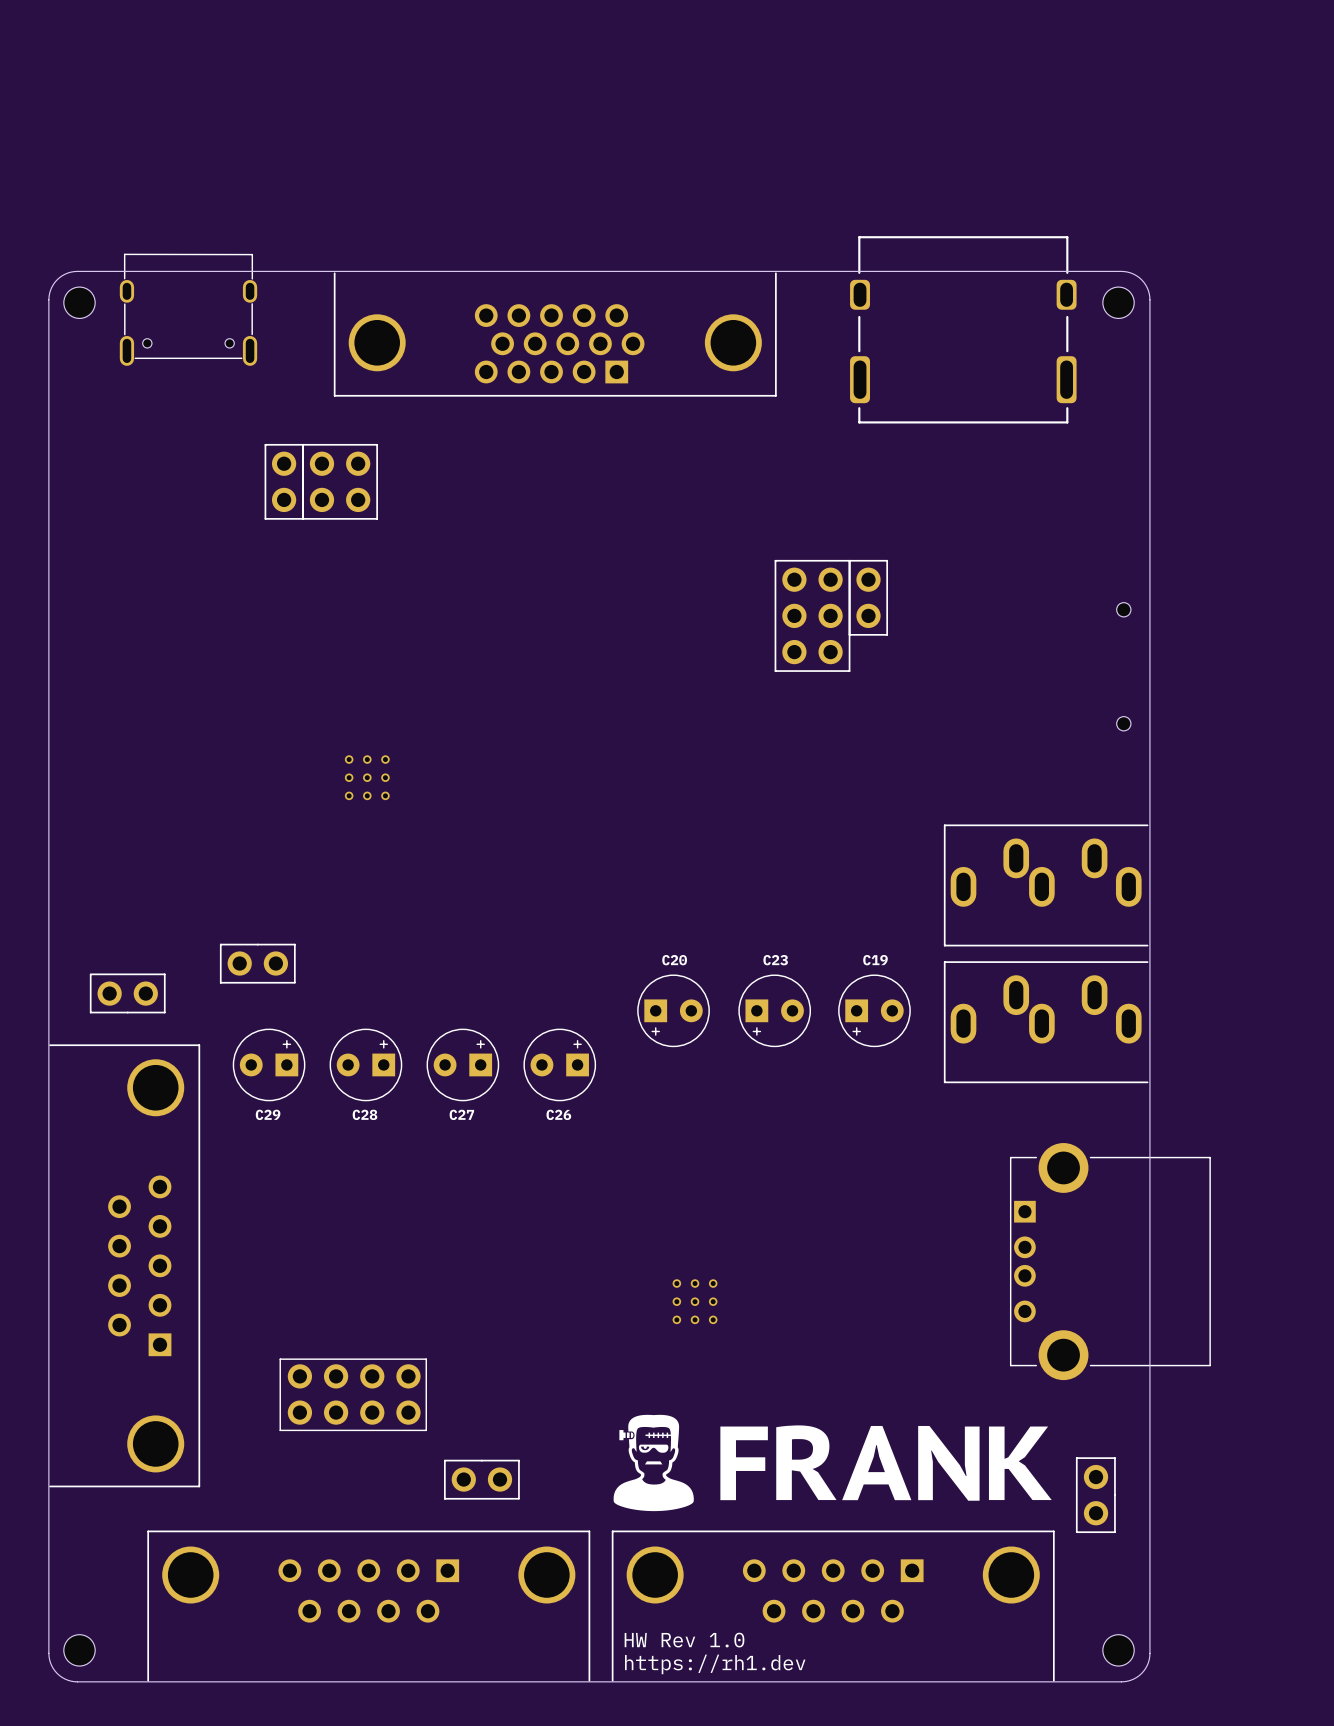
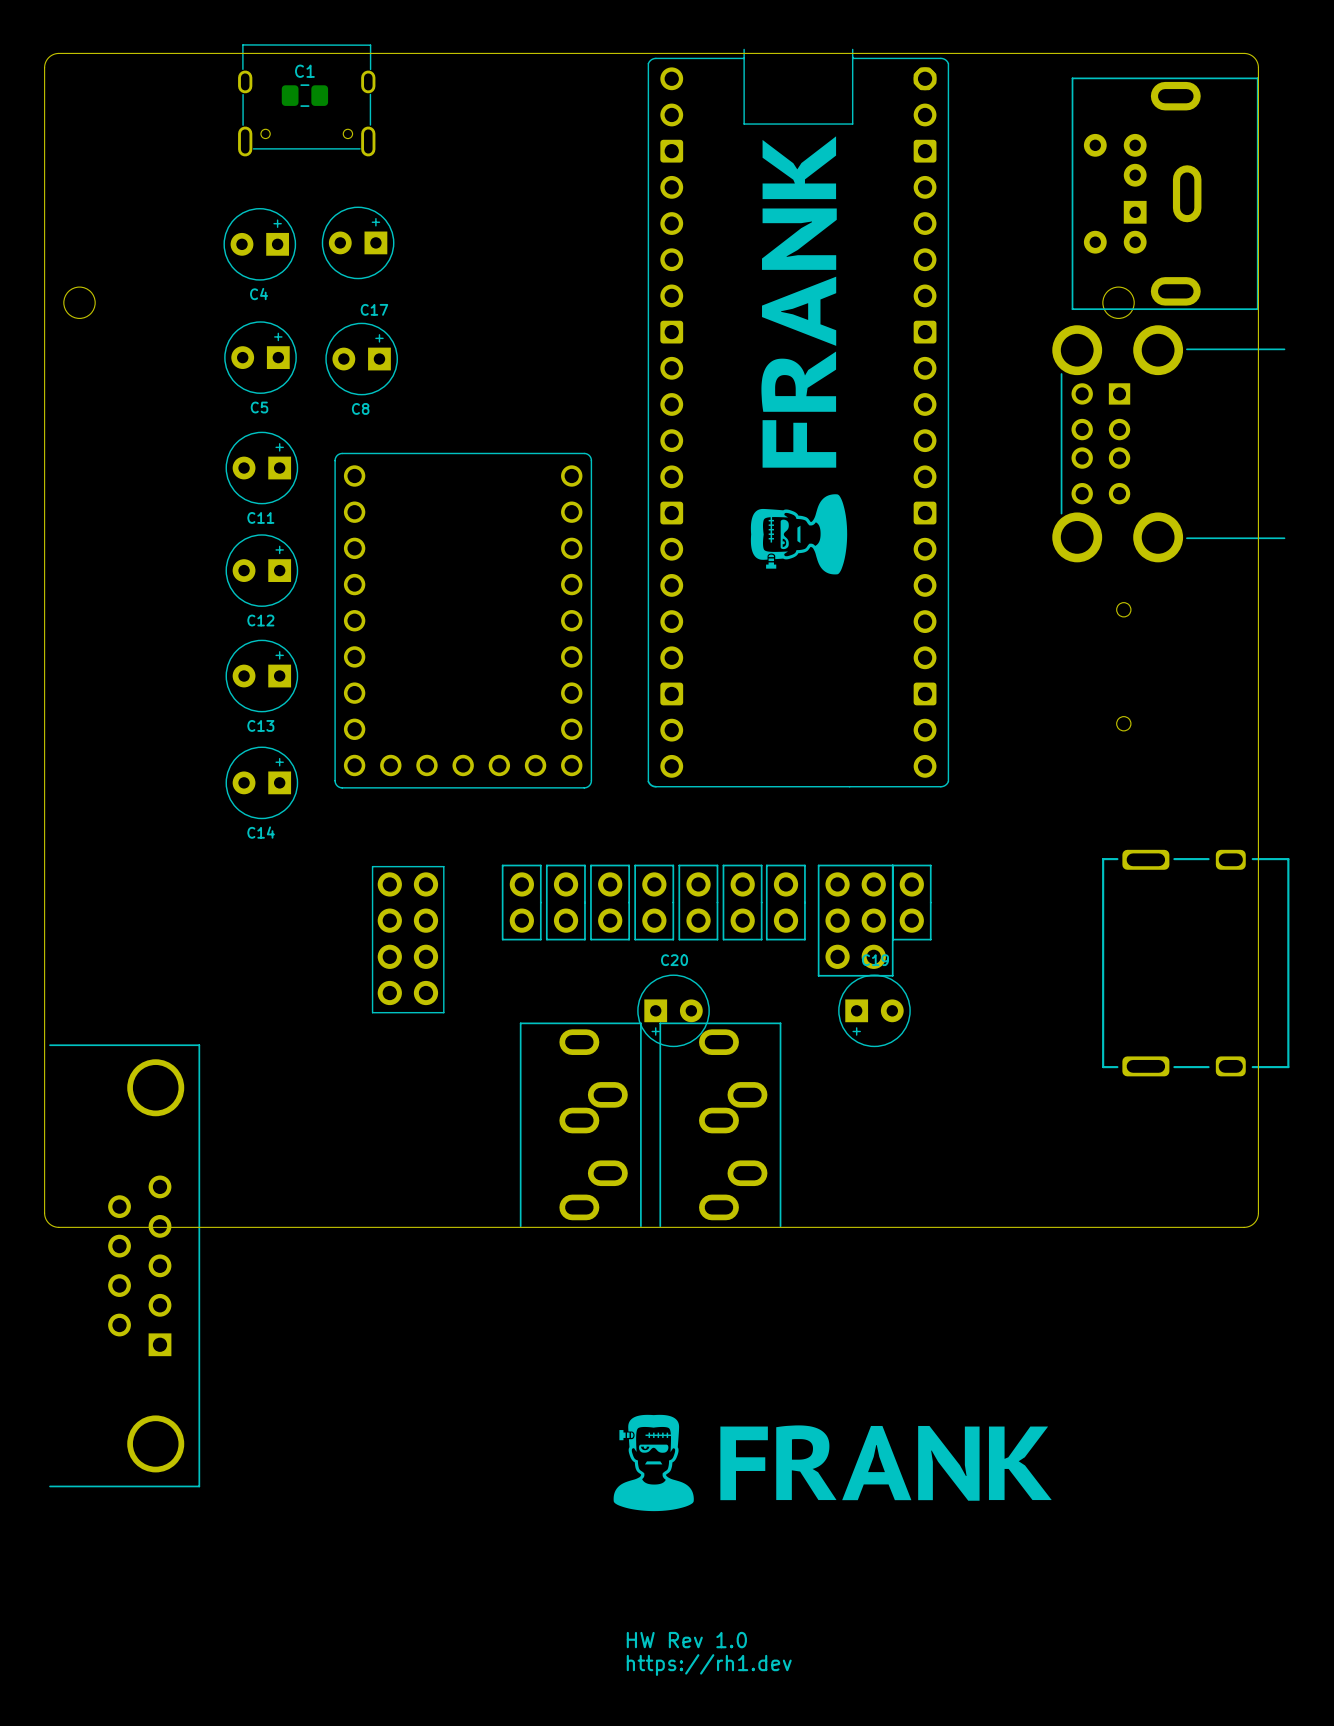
C1: none -> (304, 95)
drawing: none -> [761, 136, 837, 468]
part: none -> (1165, 193)
C17: none -> (358, 242)
C4: none -> (259, 244)
board edge: (1121, 271) (77, 271) (65, 274) (55, 282) (50, 290) (48, 299) (48, 1653) (51, 1665) (59, 1675) (67, 1680) (77, 1681) (1121, 1681) (1133, 1679) (1143, 1671) (1148, 1662) (1149, 1653) (1149, 299) (1147, 287) (1141, 279) (1133, 274) (1121, 271) -> (1244, 53) (1254, 57) (1258, 67) (1258, 1213) (1254, 1223) (1244, 1227) (58, 1227) (48, 1223) (44, 1213) (44, 67) (48, 57) (58, 53) (1244, 53)
part position: (188, 309) -> (306, 100)
part: (963, 329) -> none
part: (555, 334) -> none
C5: none -> (260, 357)
C8: none -> (361, 359)
part: none -> (798, 418)
part: none -> (1168, 443)
C11: none -> (261, 468)
part: (284, 481) -> none
part: (340, 481) -> none
drawing: none -> [750, 494, 848, 575]
C12: none -> (261, 570)
part: (868, 597) -> none
part position: (812, 615) -> (855, 920)
part: none -> (463, 620)
C13: none -> (261, 676)
part: (367, 777) -> none
C14: none -> (261, 782)
part: (1046, 885) -> none
part: none -> (521, 902)
part: none -> (565, 902)
part: none -> (610, 902)
part: none -> (654, 902)
part: none -> (698, 902)
part: none -> (742, 902)
part: none -> (785, 902)
part: none -> (911, 902)
part: none -> (408, 939)
part: (257, 963) -> none
part: none -> (1195, 963)
part: (127, 993) -> none
C23: (774, 1010) -> none
part: (1046, 1022) -> none
C29: (269, 1064) -> none
C28: (365, 1064) -> none
C27: (462, 1064) -> none
C26: (559, 1064) -> none
part: none -> (580, 1124)
part: none -> (720, 1124)
part: (1110, 1261) -> none
part: (695, 1301) -> none
part: (353, 1394) -> none
part: (481, 1479) -> none
part: (1095, 1495) -> none
part: (368, 1606) -> none
part: (833, 1606) -> none
part: (79, 1650) -> none
part: (1118, 1650) -> none

